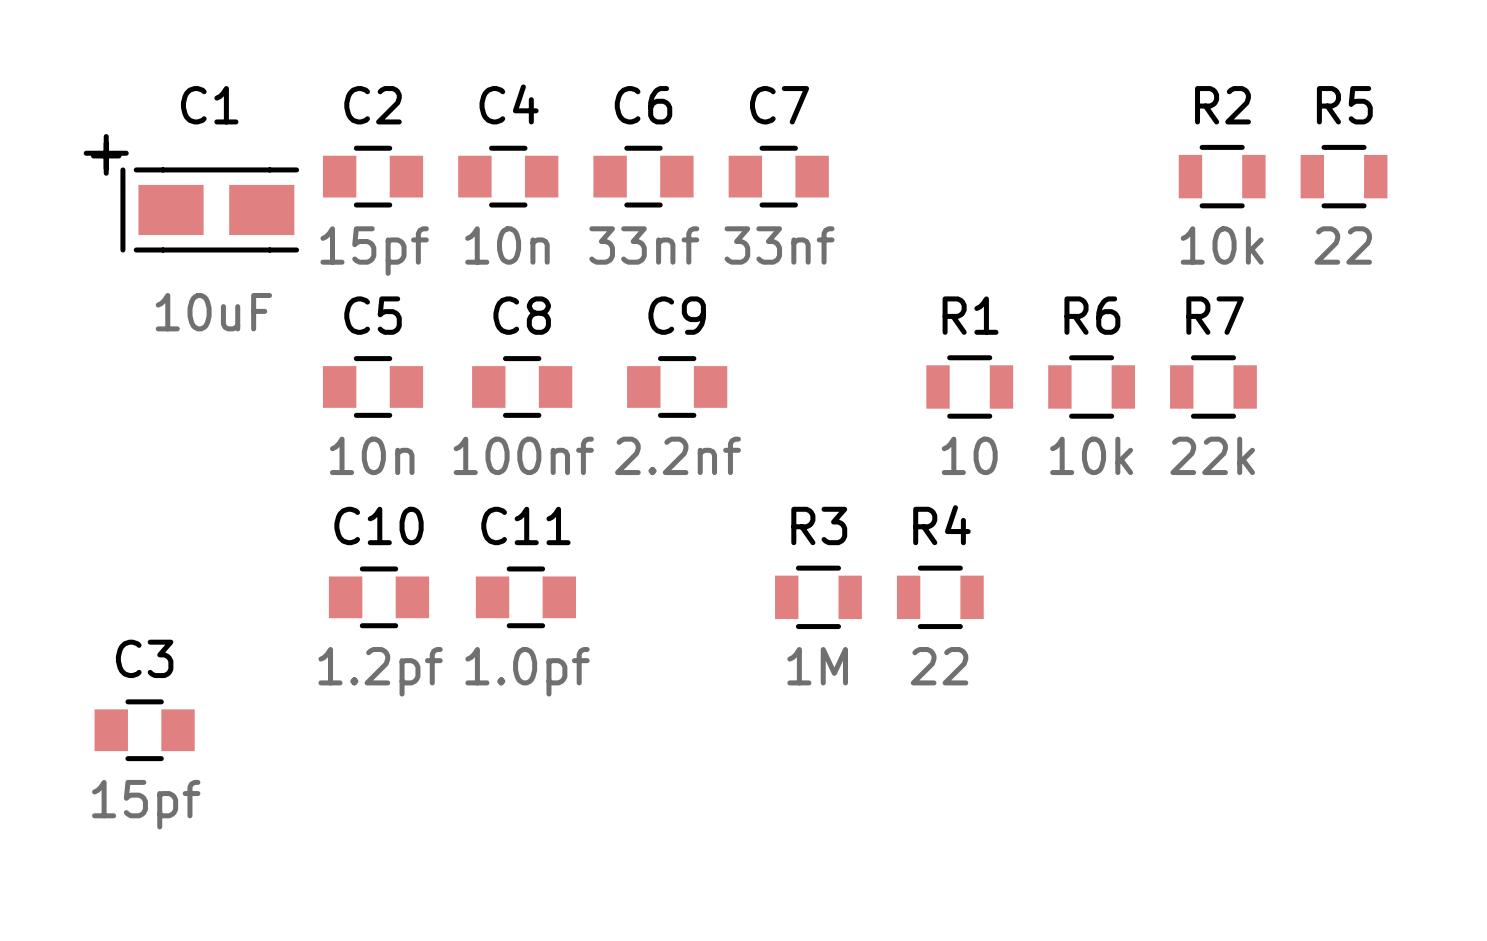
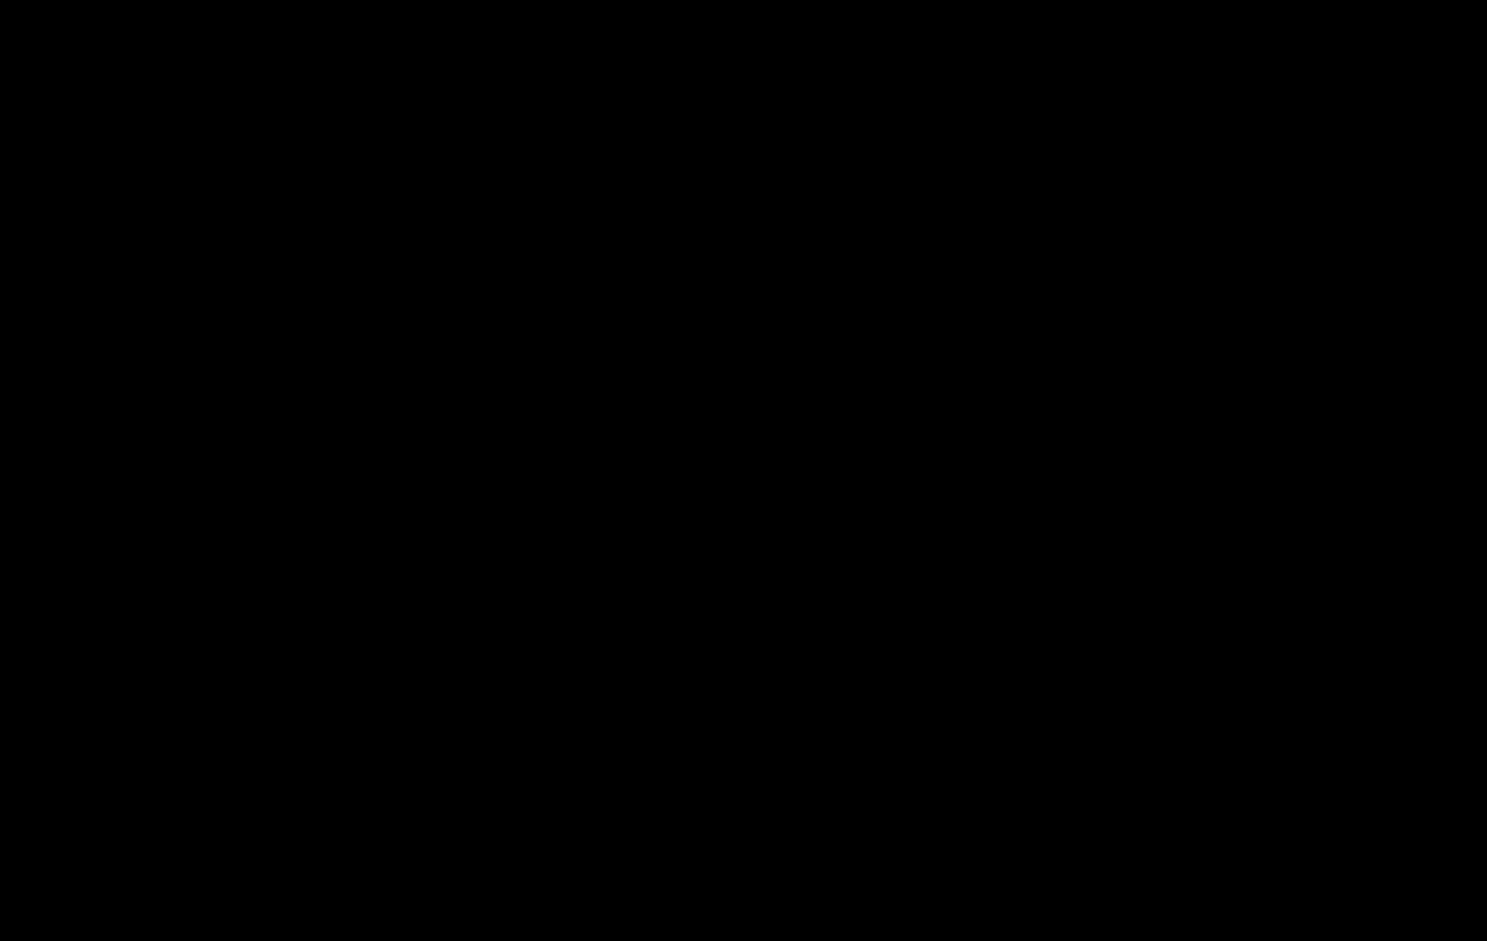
C2: 15pf (373, 176) -> none
C4: 10n (508, 176) -> none
C6: 33nf (643, 176) -> none
C7: 33nf (778, 176) -> none
R2: 10k (1222, 176) -> none
R5: 22 (1344, 176) -> none
C1: 10uF (191, 193) -> none
C5: 10n (373, 386) -> none
C8: 100nf (522, 386) -> none
C9: 2.2nf (677, 386) -> none
R1: 10 (969, 386) -> none
R6: 10k (1091, 386) -> none
R7: 22k (1213, 386) -> none
C10: 1.2pf (378, 597) -> none
C11: 1.0pf (525, 597) -> none
R3: 1M (818, 597) -> none
R4: 22 (940, 597) -> none
C3: 15pf (144, 730) -> none

